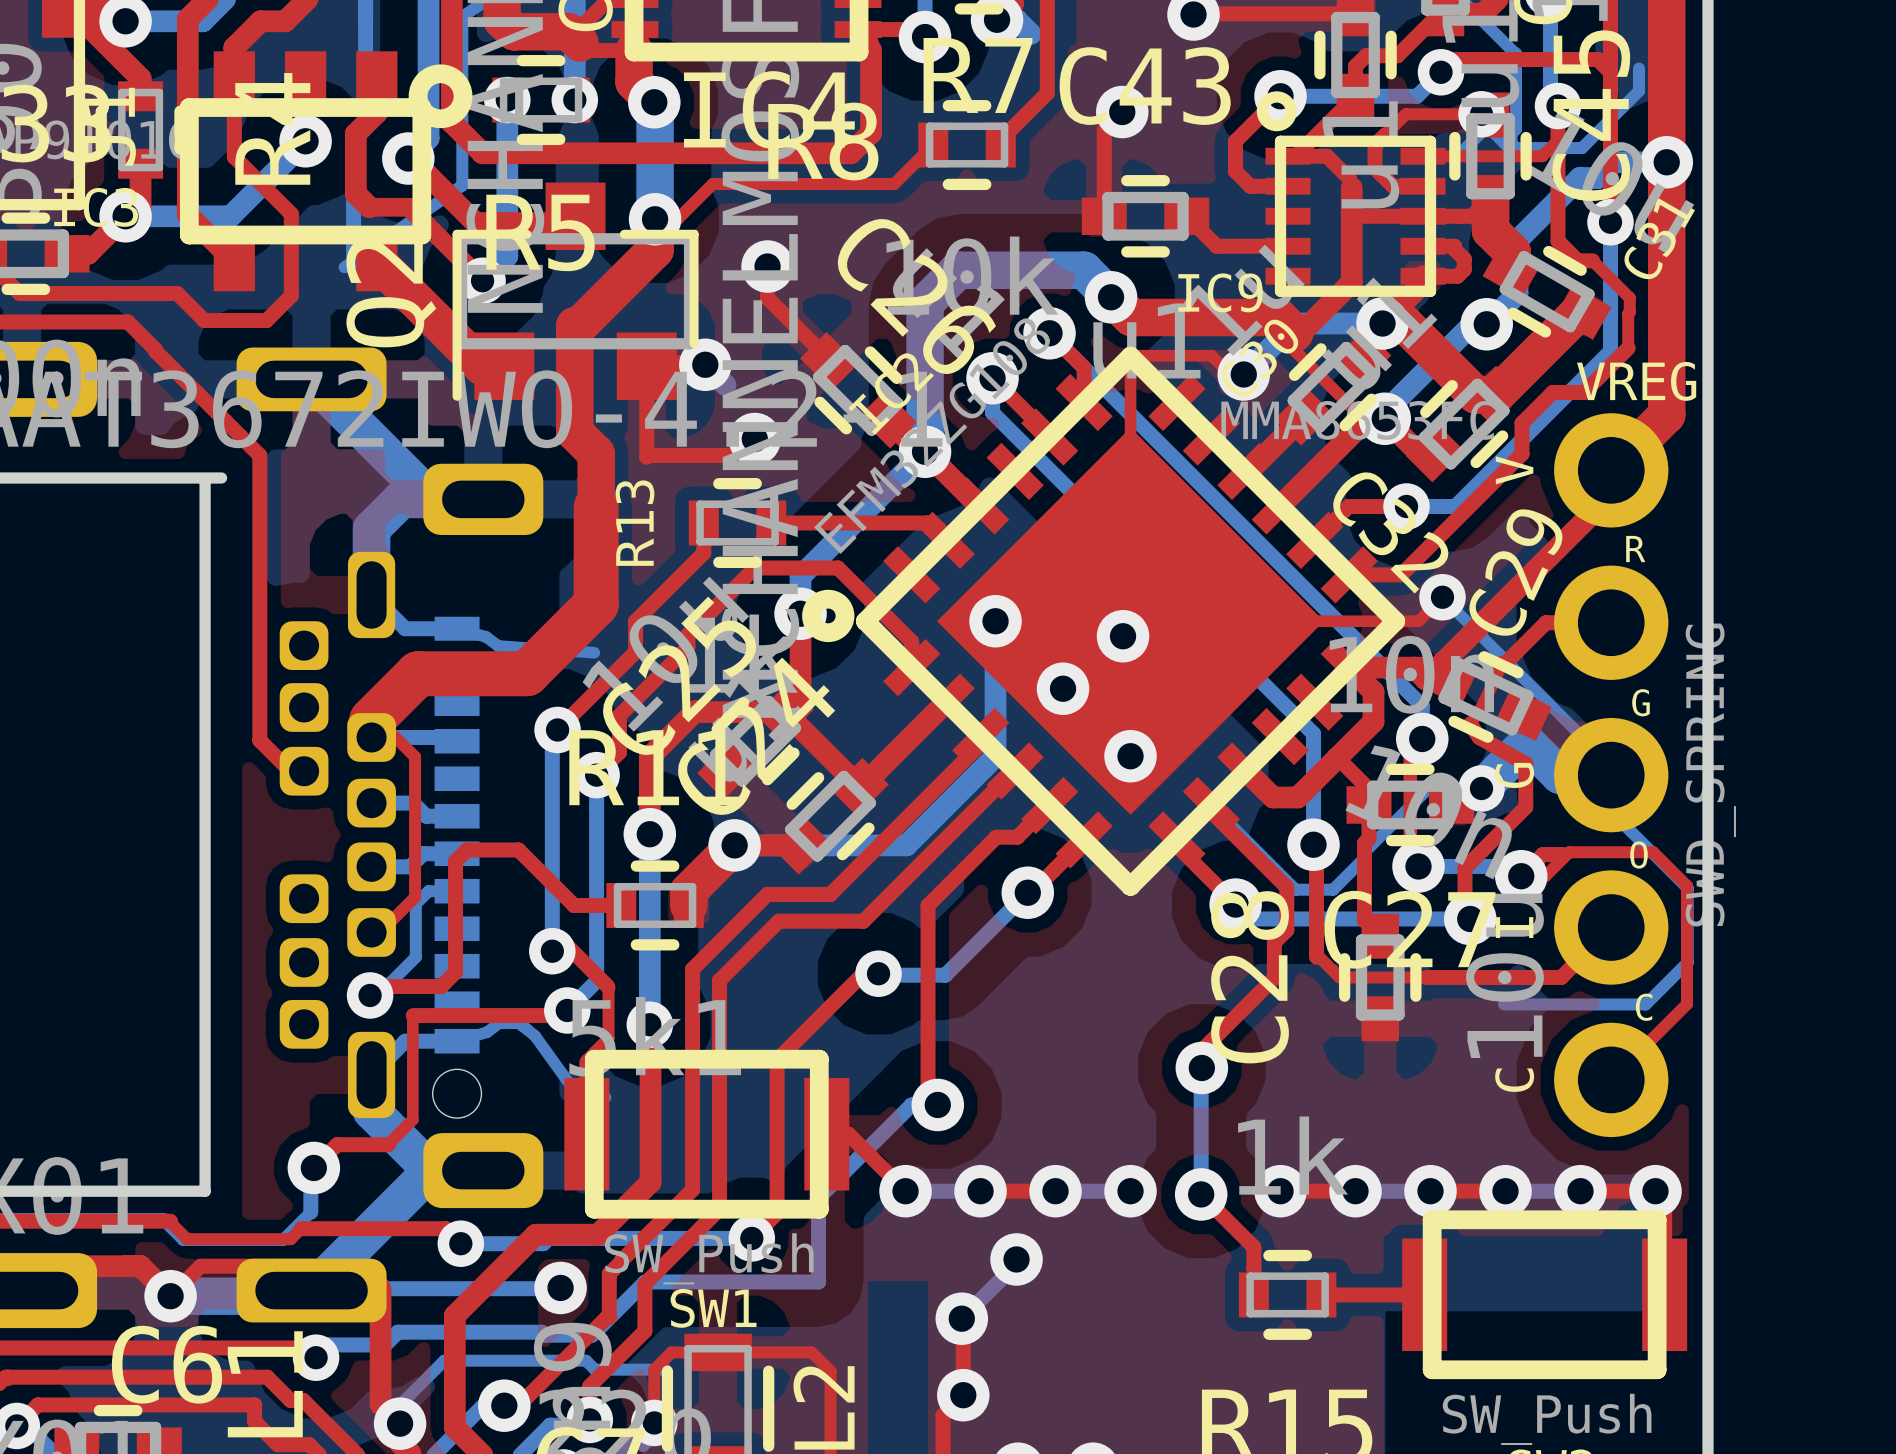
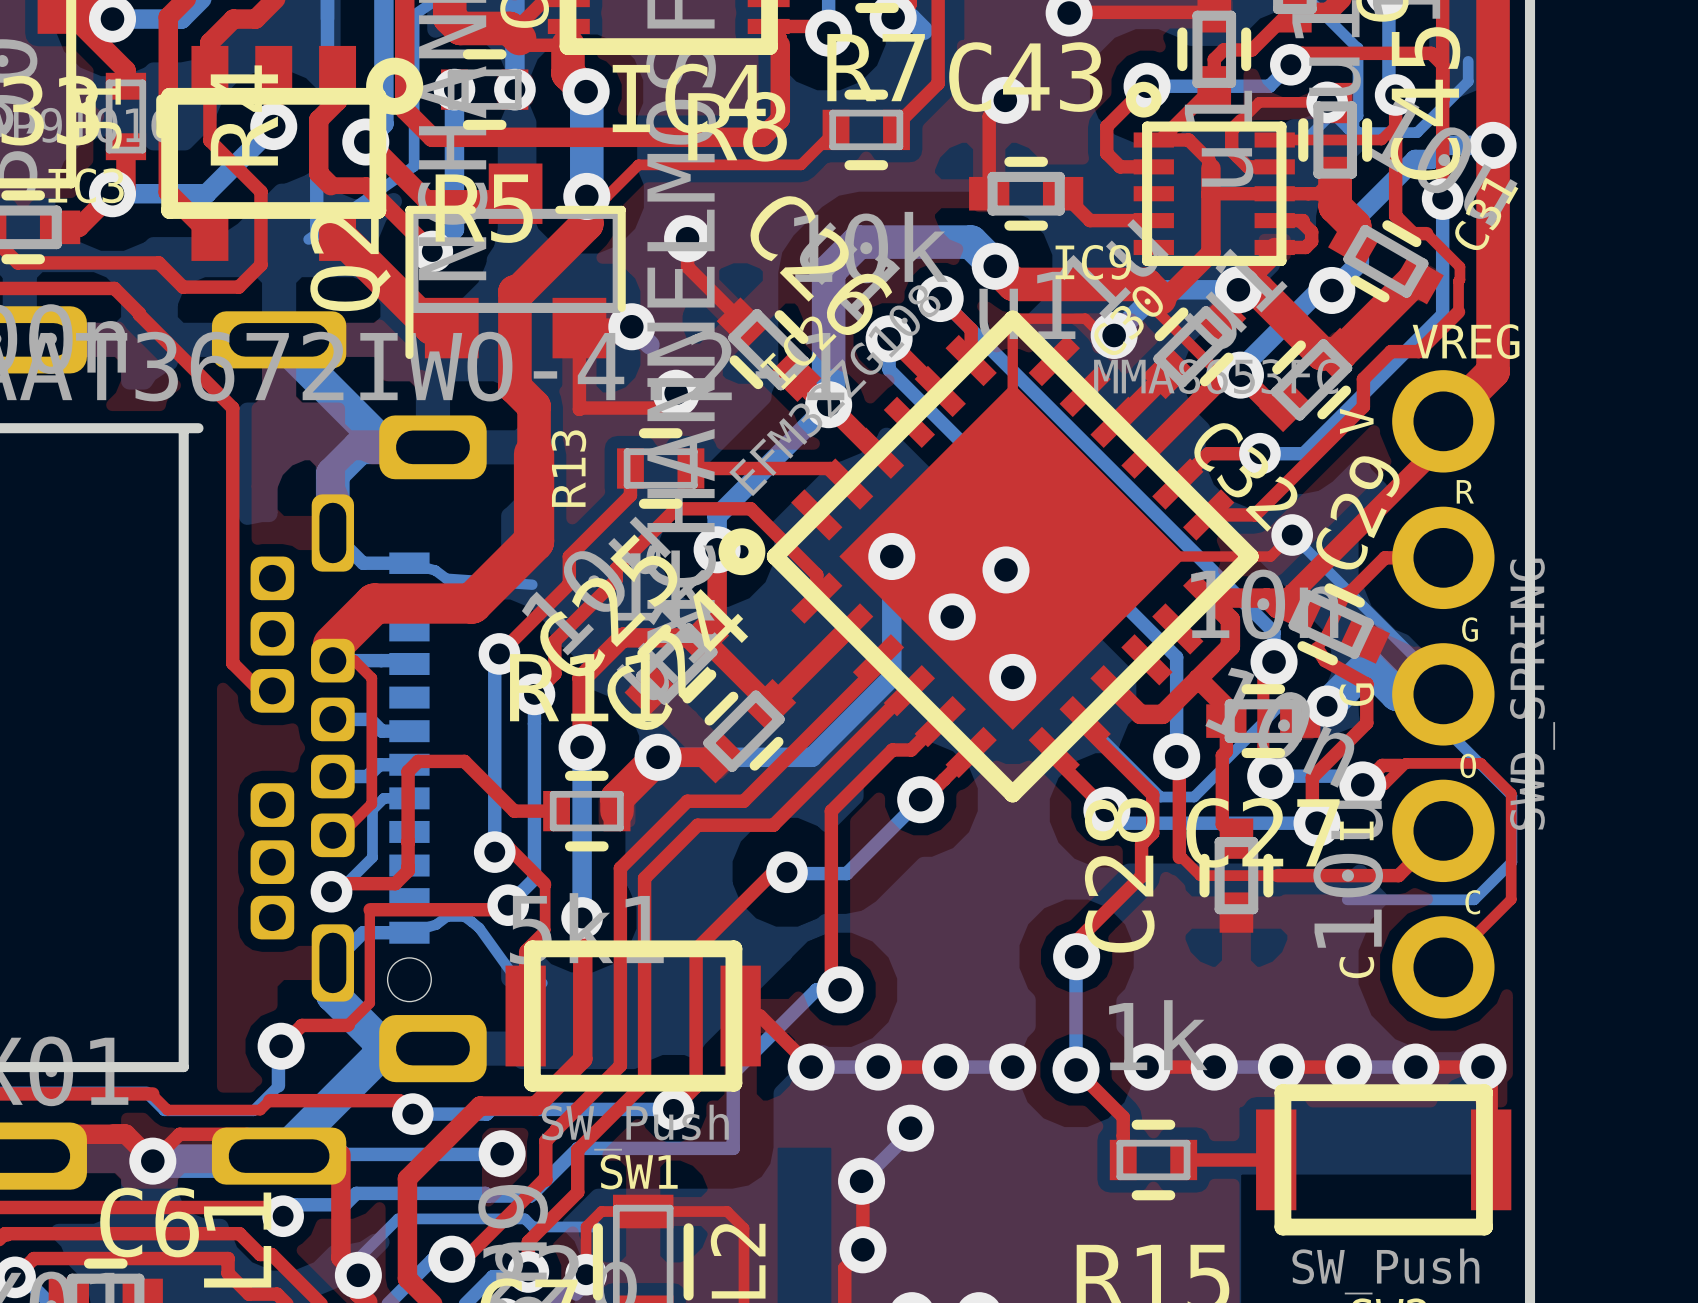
top track width: thin (1337, 757) (1369, 789) -> thick (1198, 678) (1226, 706)

